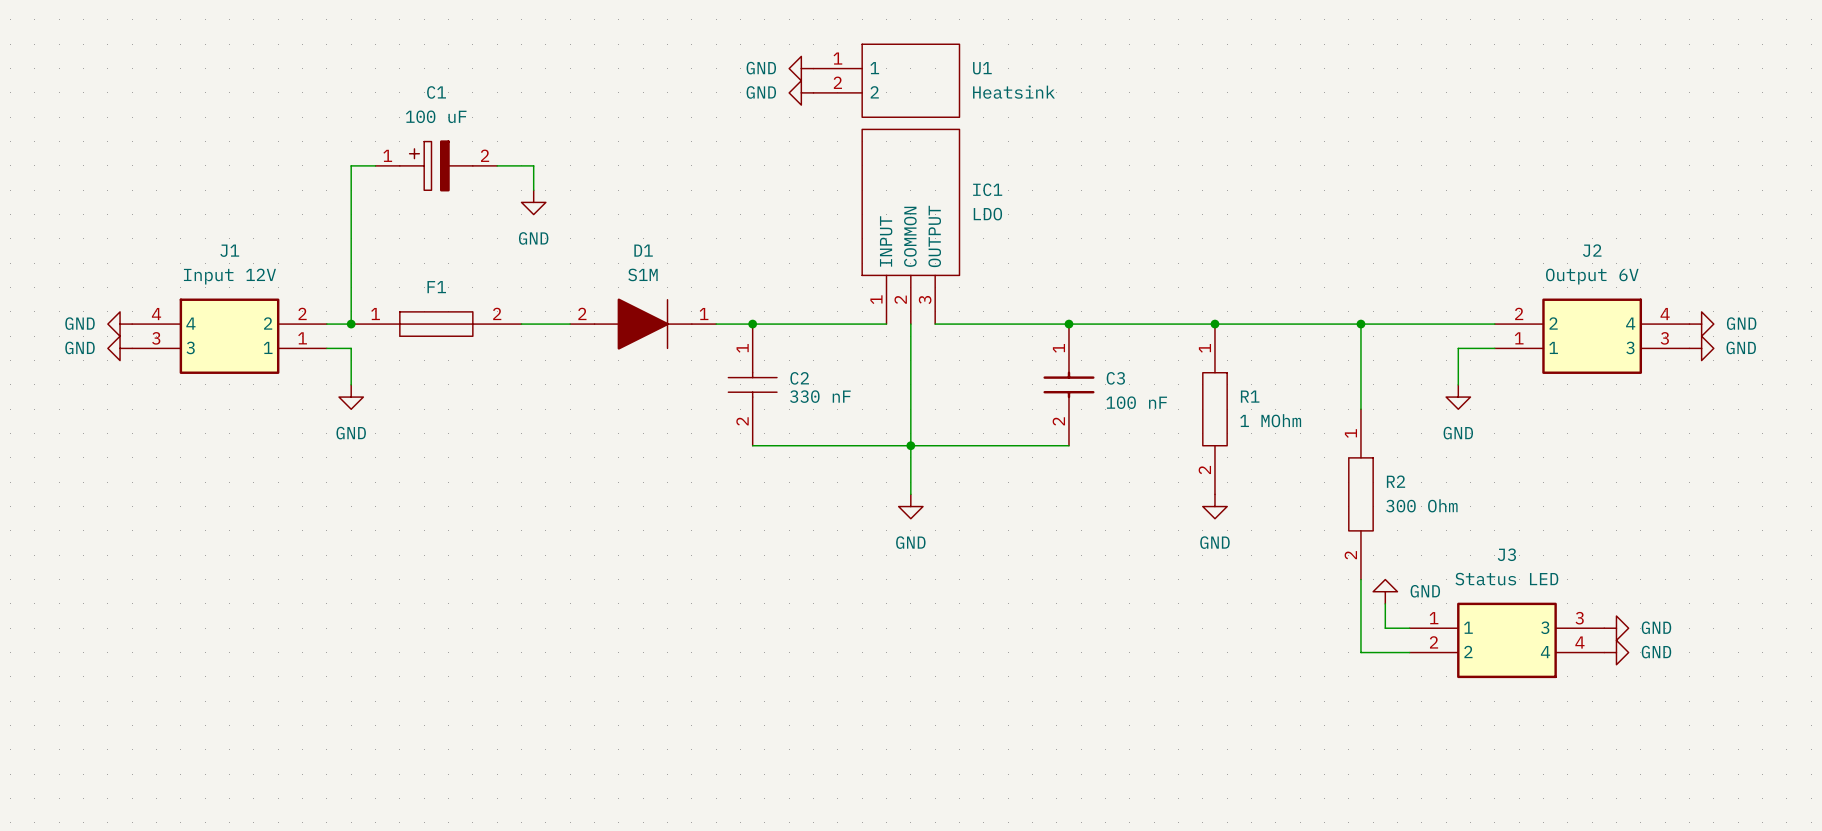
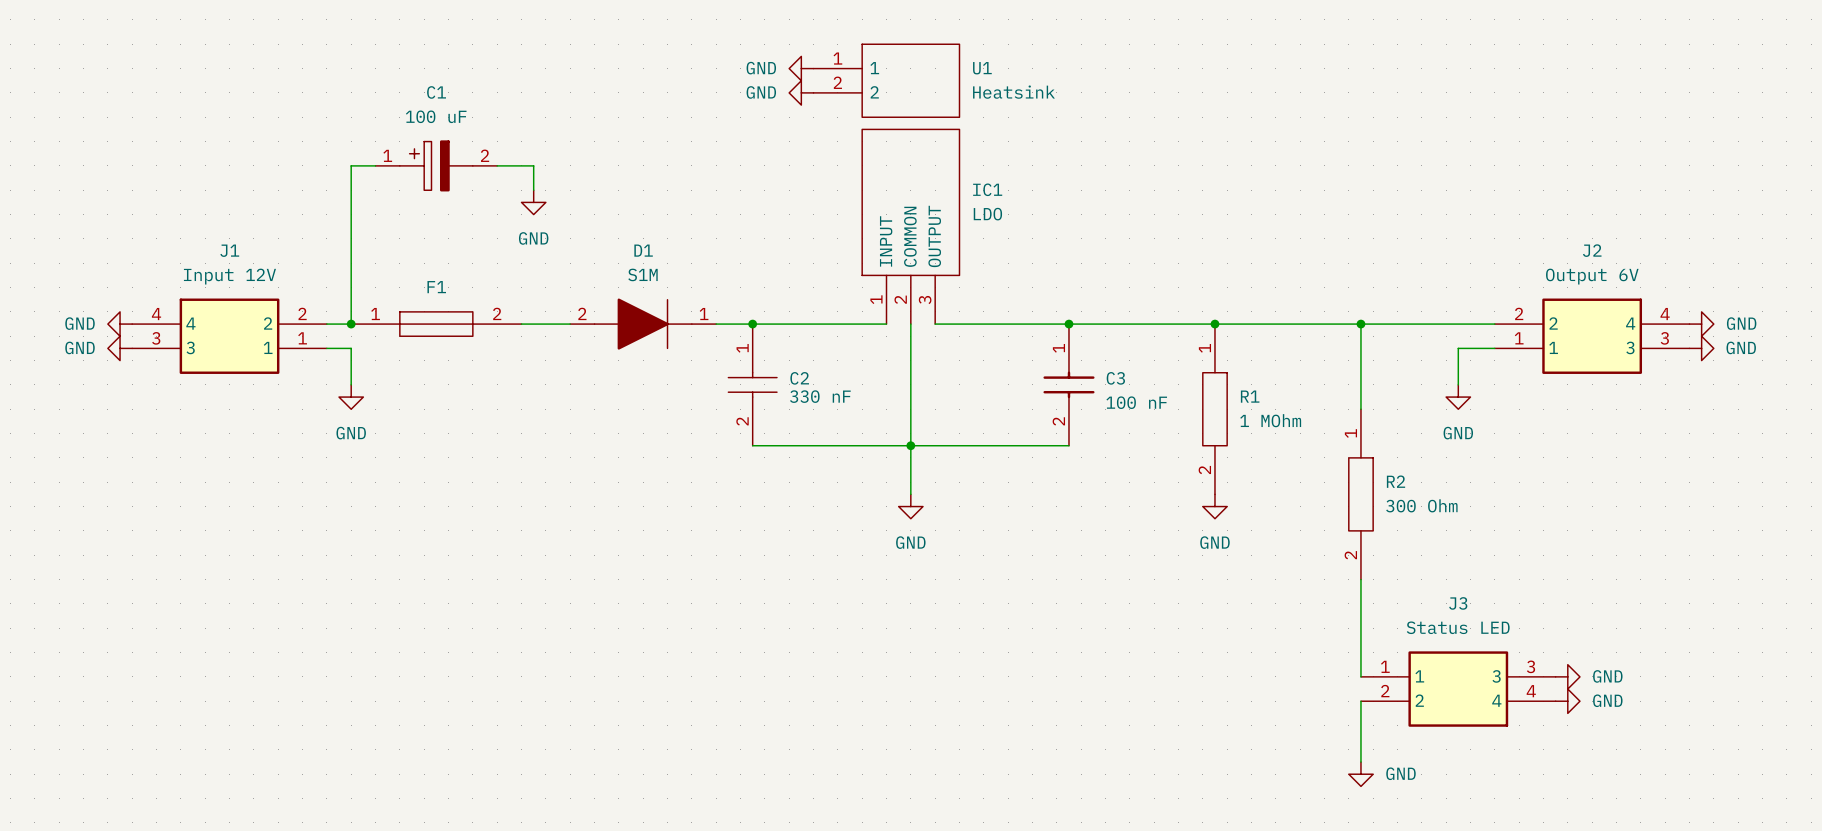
power symbol: GND (1385, 591) -> none
wire: (1385, 603) (1385, 628) (1409, 628) -> none
power symbol: GND (1616, 628) -> none
J3 position: (1506, 640) -> (1458, 689)
wire: (1360, 652) (1409, 652) -> (1360, 652) (1360, 676)
power symbol: GND (1616, 652) -> none
power symbol: none -> GND (1567, 676)
wire: none -> (1360, 701) (1360, 762)
power symbol: none -> GND (1567, 701)
power symbol: none -> GND (1360, 774)

